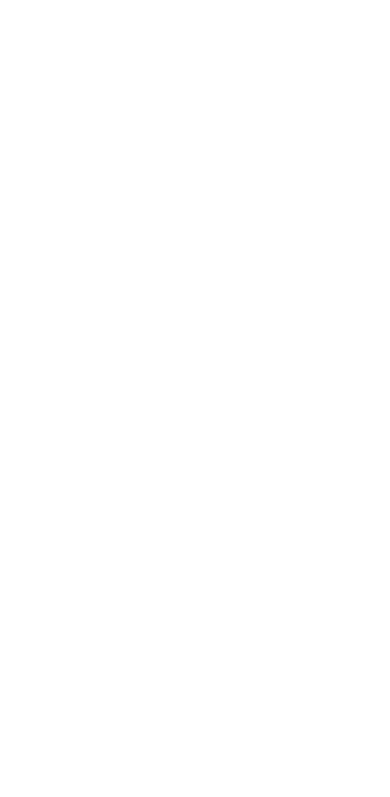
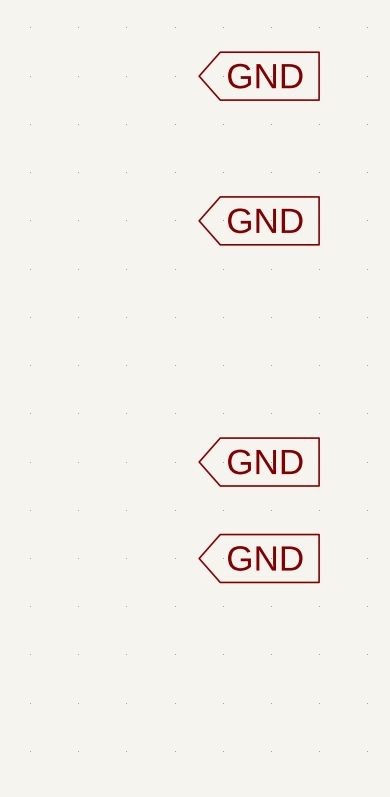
global label: none -> GND (265, 76)
global label: none -> GND (265, 220)
global label: none -> GND (265, 462)
global label: none -> GND (265, 558)

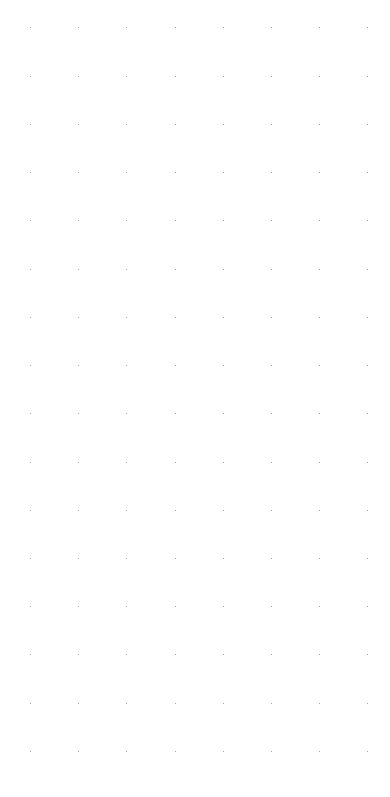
global label: GND (265, 76) -> none
global label: GND (265, 220) -> none
global label: GND (265, 462) -> none
global label: GND (265, 558) -> none

